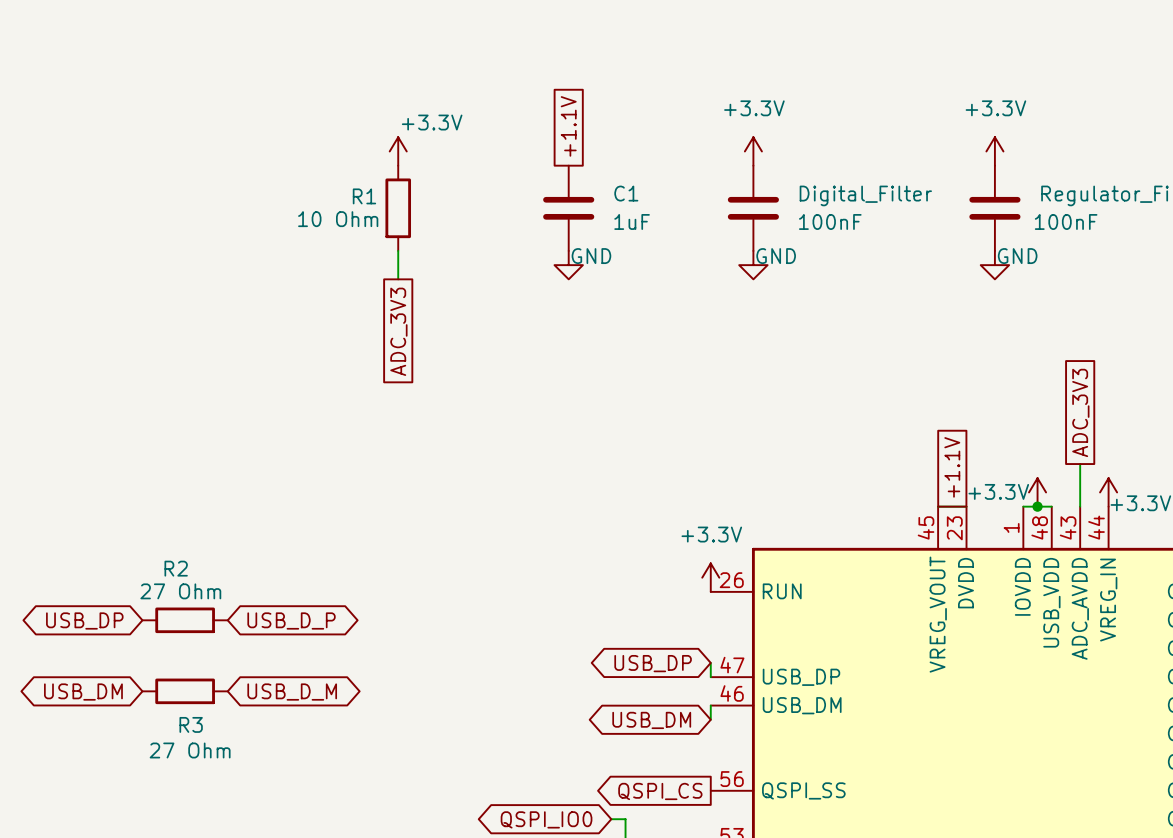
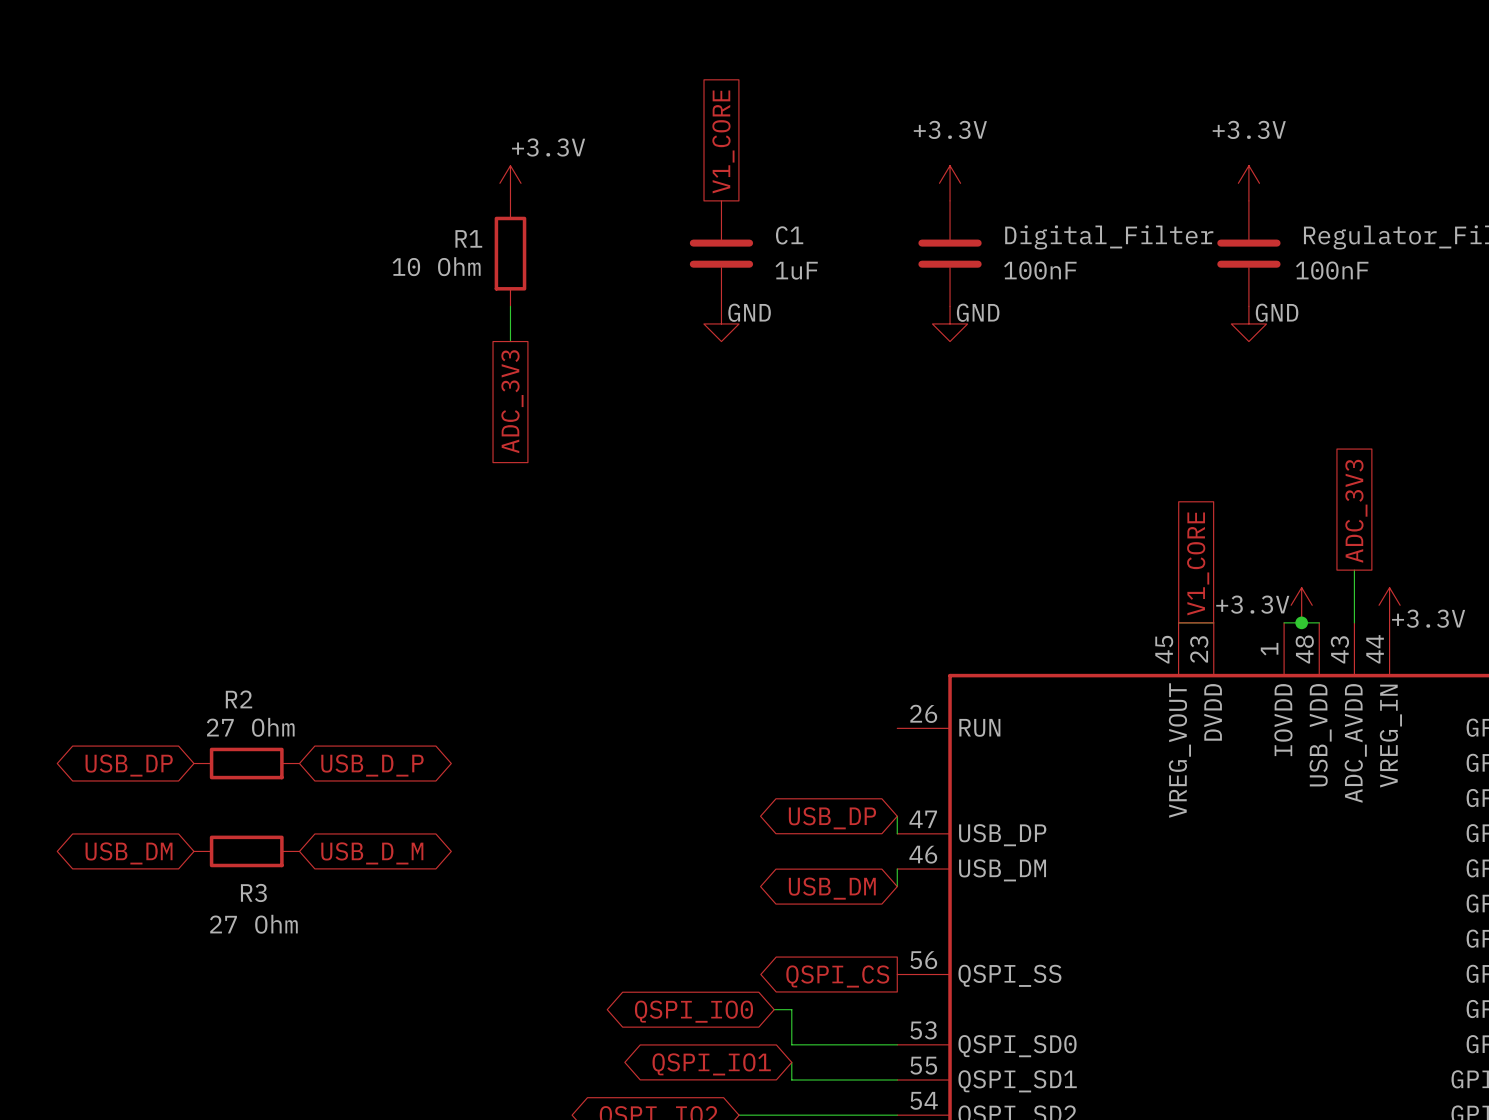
global label: +1.1V (568, 126) -> V1_CORE (723, 141)
global label: +1.1V (952, 467) -> V1_CORE (1198, 563)
power symbol: +3.3V (710, 577) -> none

